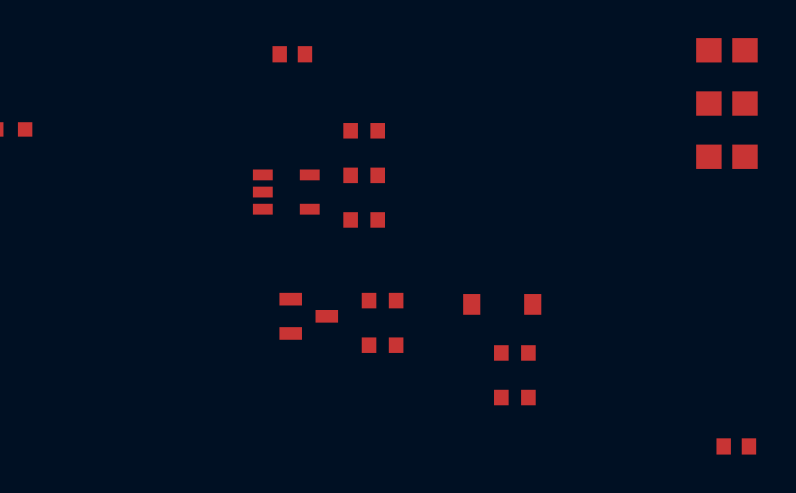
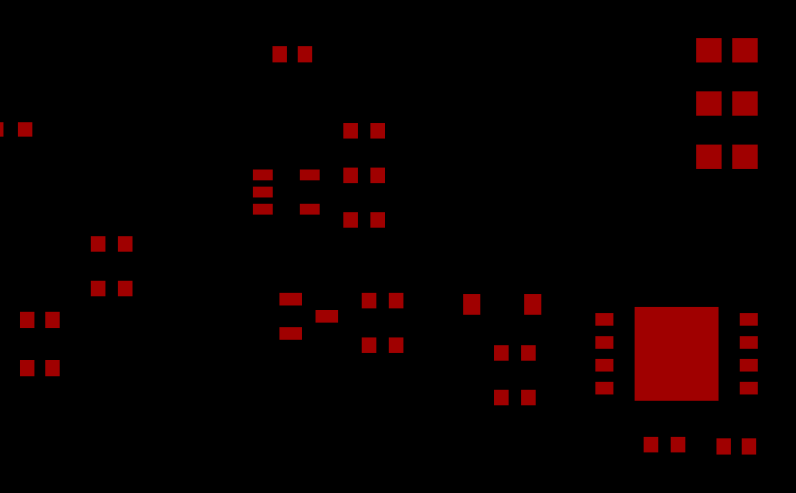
part: none -> (111, 243)
part: none -> (111, 288)
part: none -> (39, 319)
part: none -> (676, 353)
part: none -> (39, 368)
part: none -> (664, 444)

